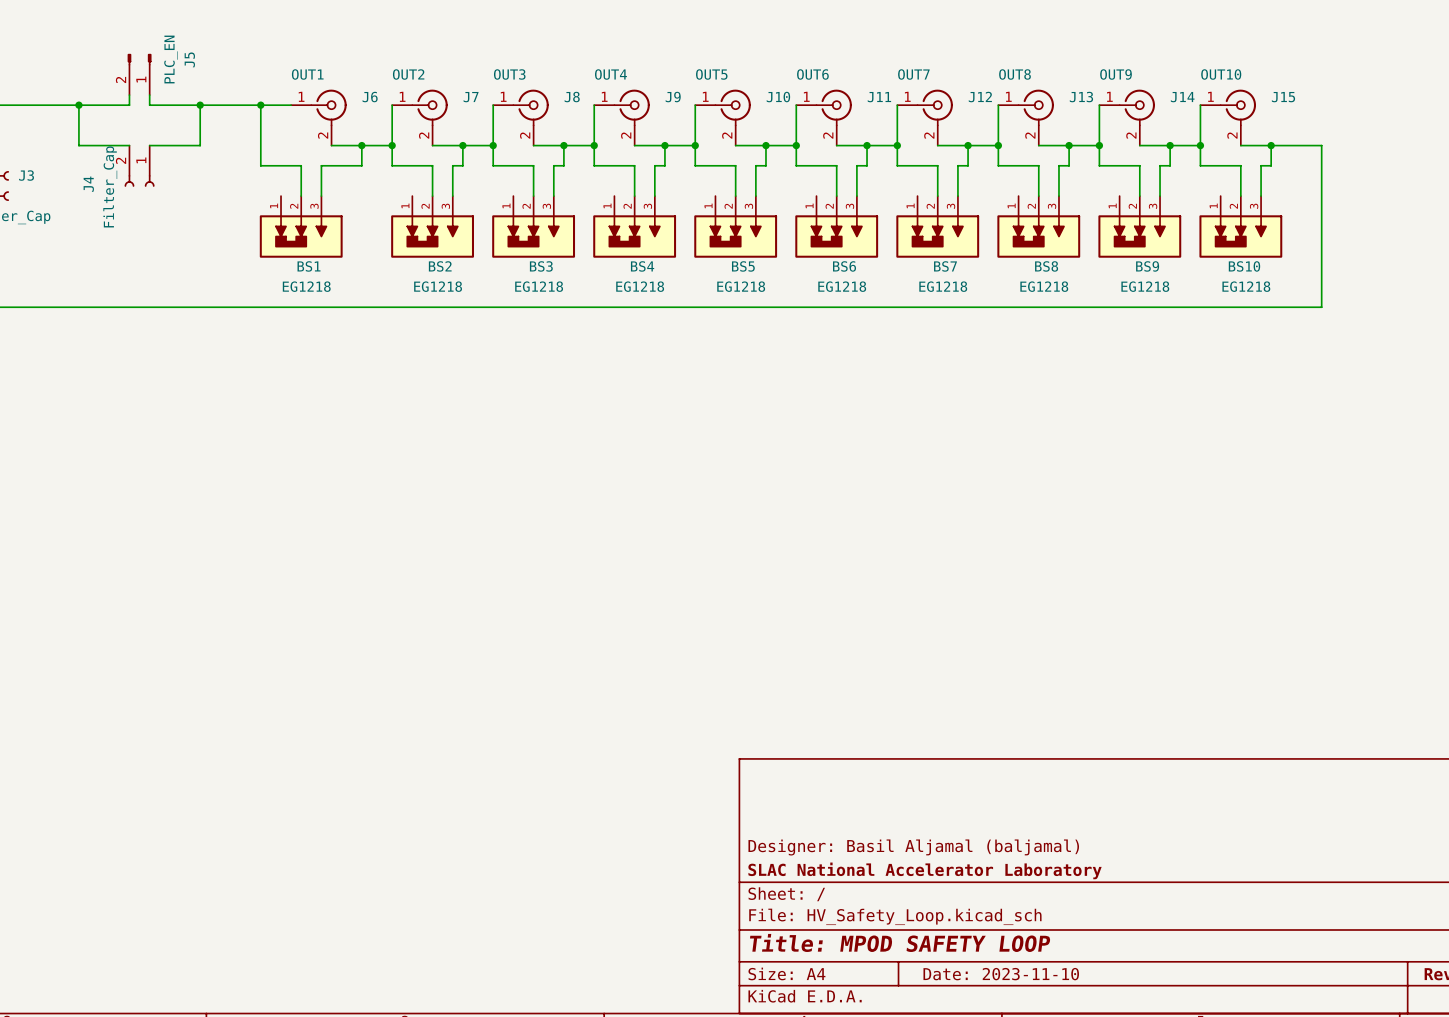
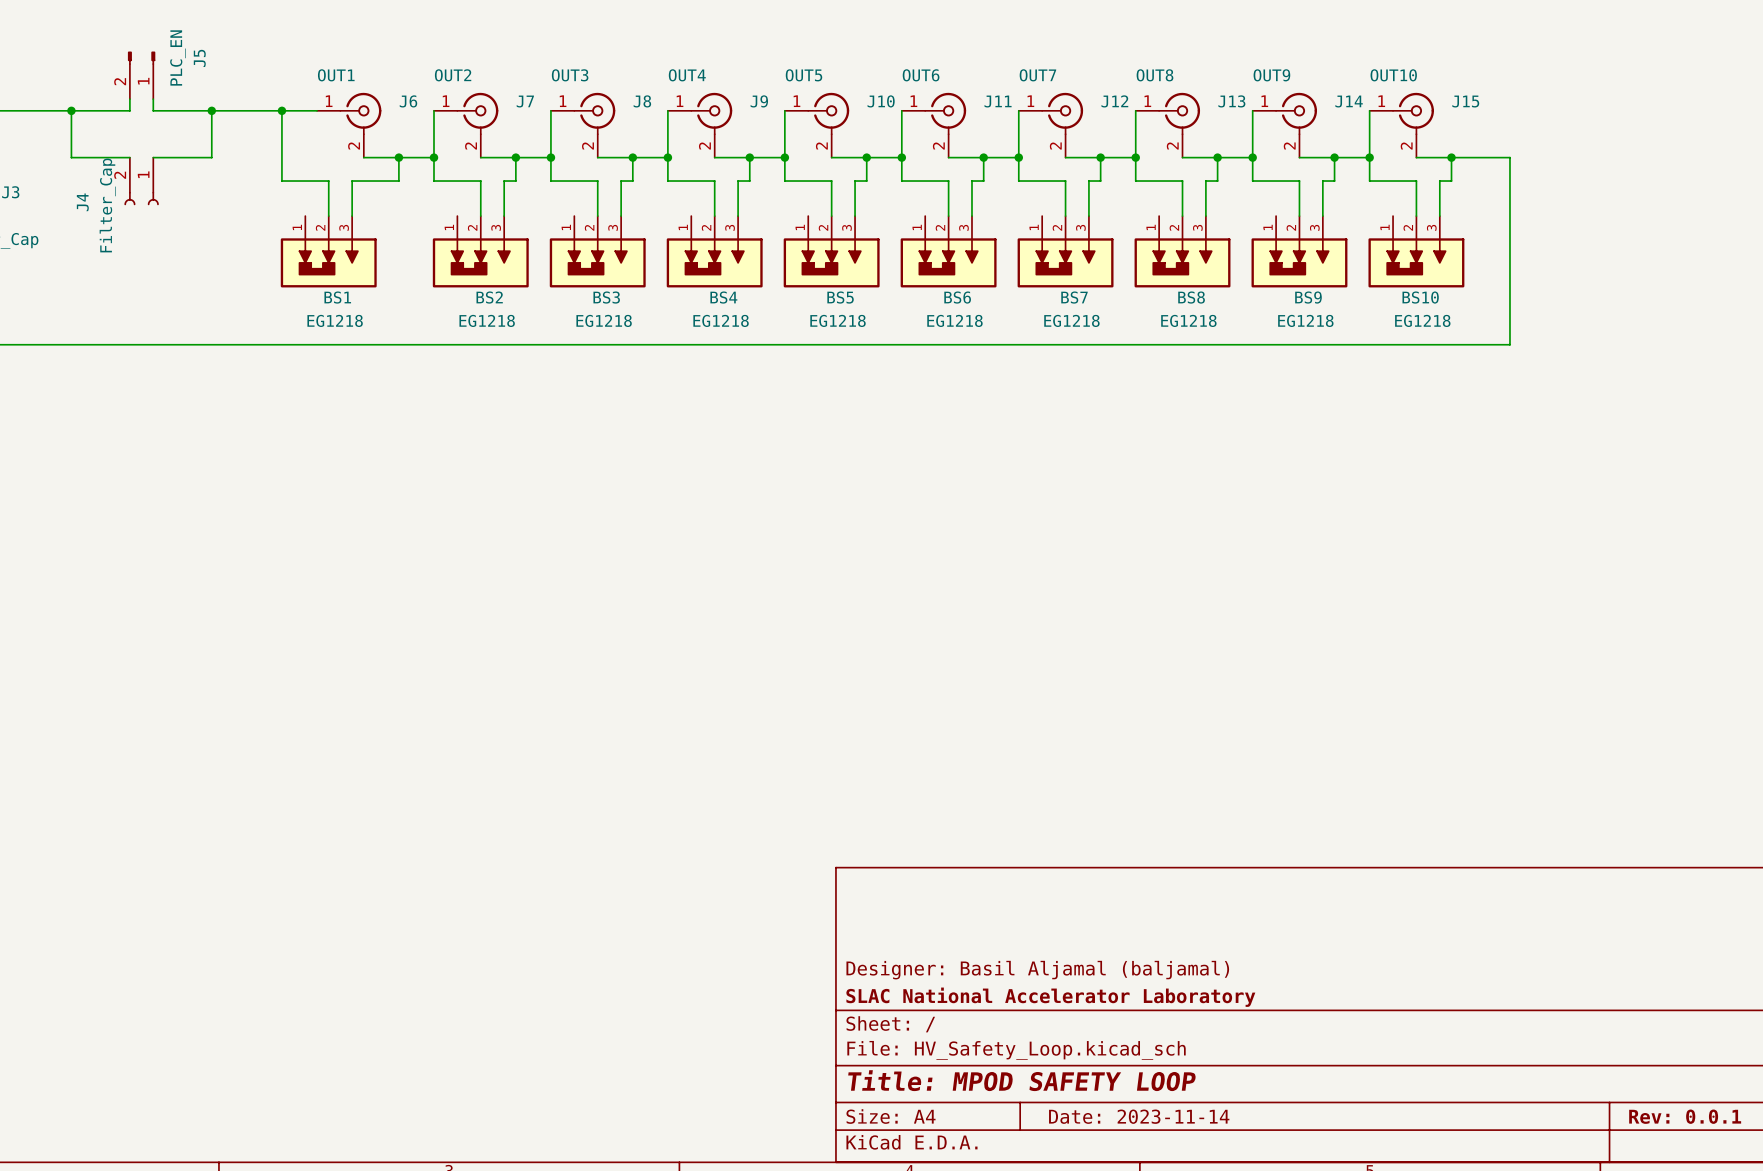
title block: Date: 2023-11-10 (1001, 974) -> Date: 2023-11-14 (1139, 1116)

